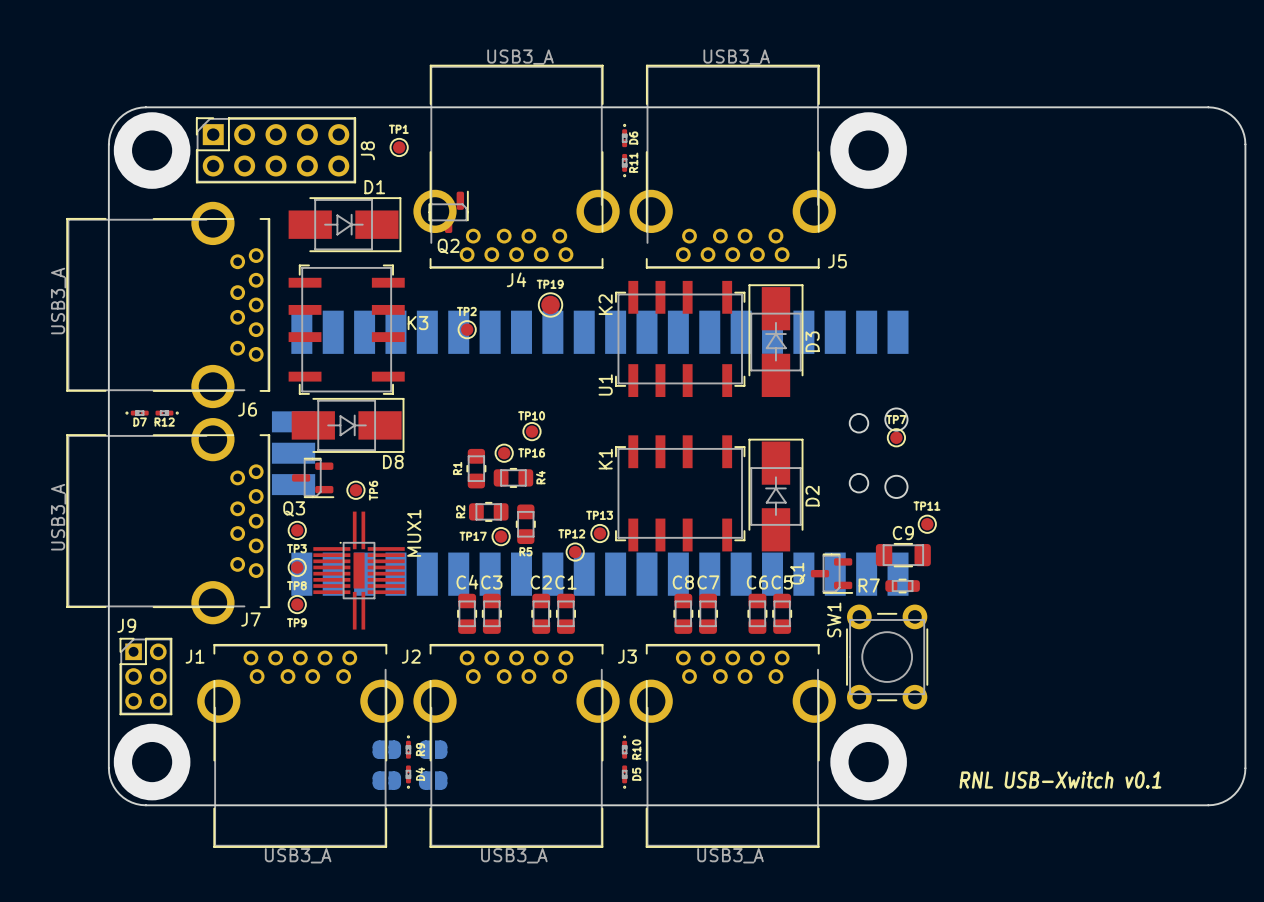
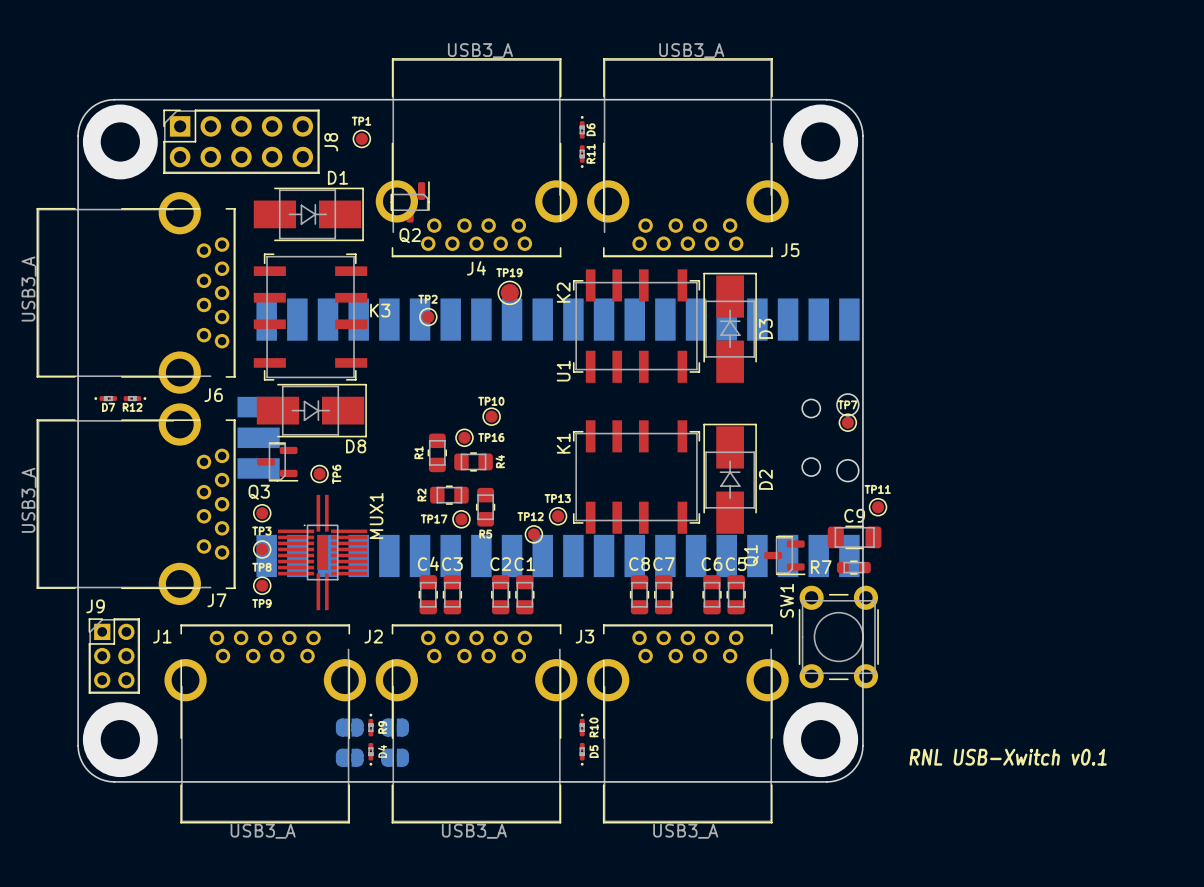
board edge: (874, 107) (1213, 107) (1222, 110) (1234, 118) (1242, 130) (1245, 144) (1245, 768) (1240, 786) (1226, 800) (1208, 805) (874, 805) -> (826, 99) (840, 102) (852, 110) (860, 122) (862, 135) (862, 745) (860, 759) (852, 771) (840, 779) (826, 781)

